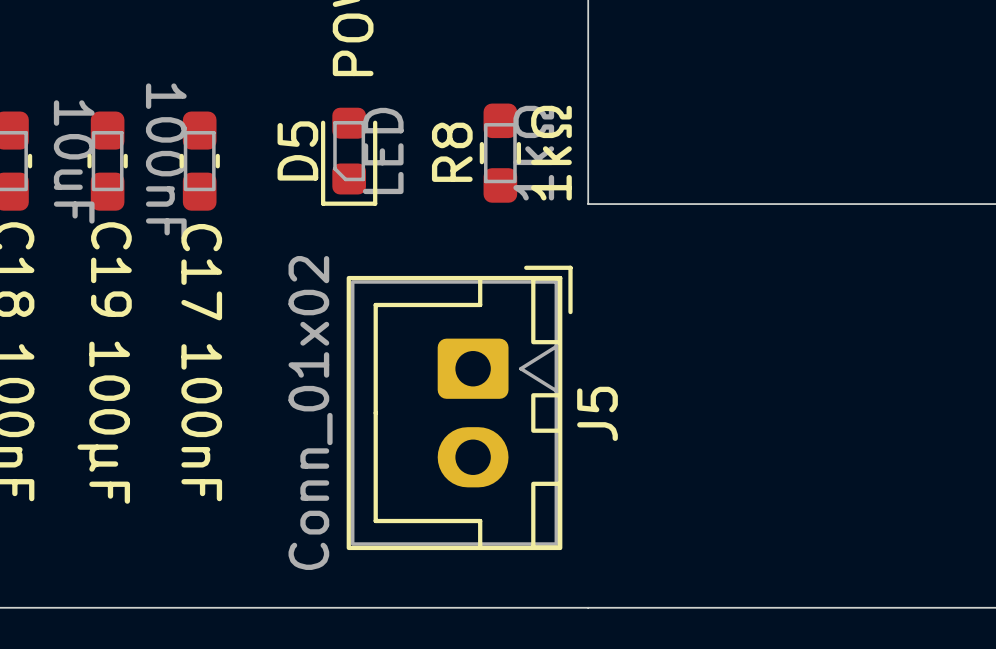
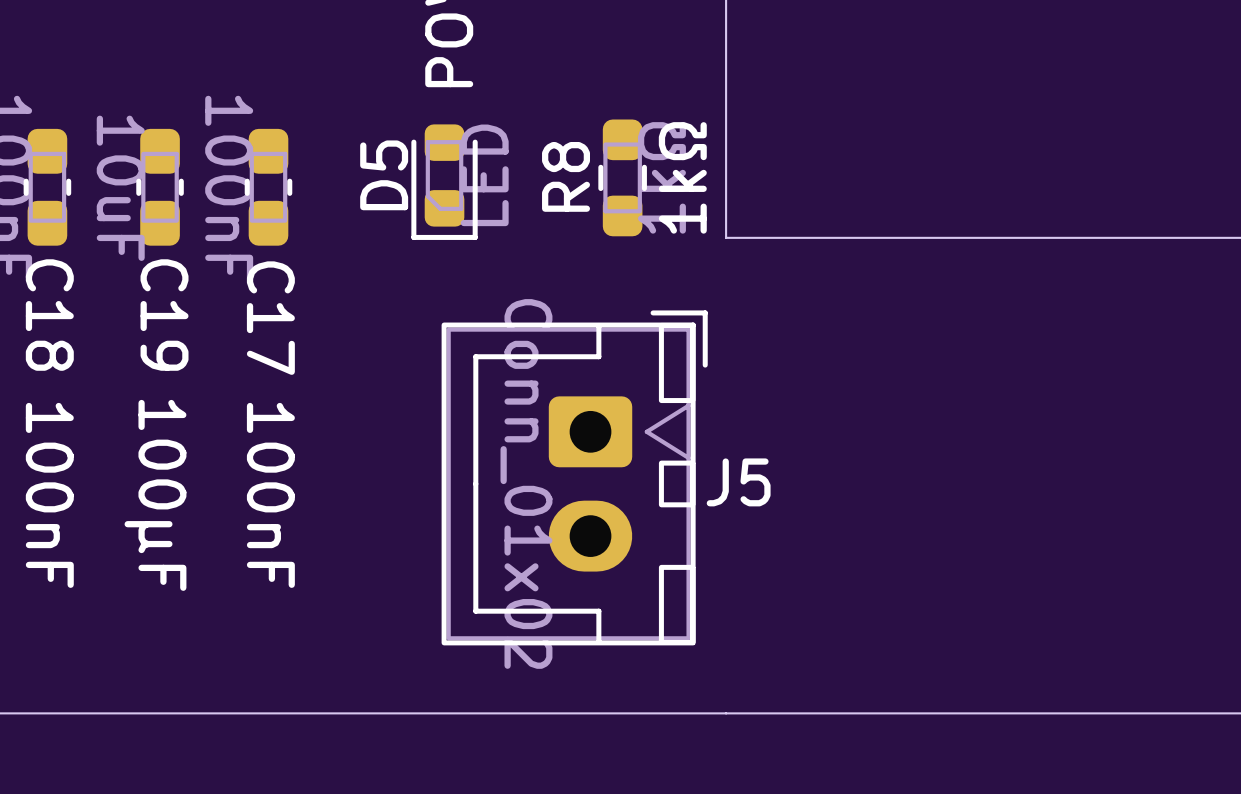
J5 value rotation: 0° (310, 412) -> 180° (526, 483)
J5 name rotation: 0° (597, 413) -> 90° clockwise (738, 482)

